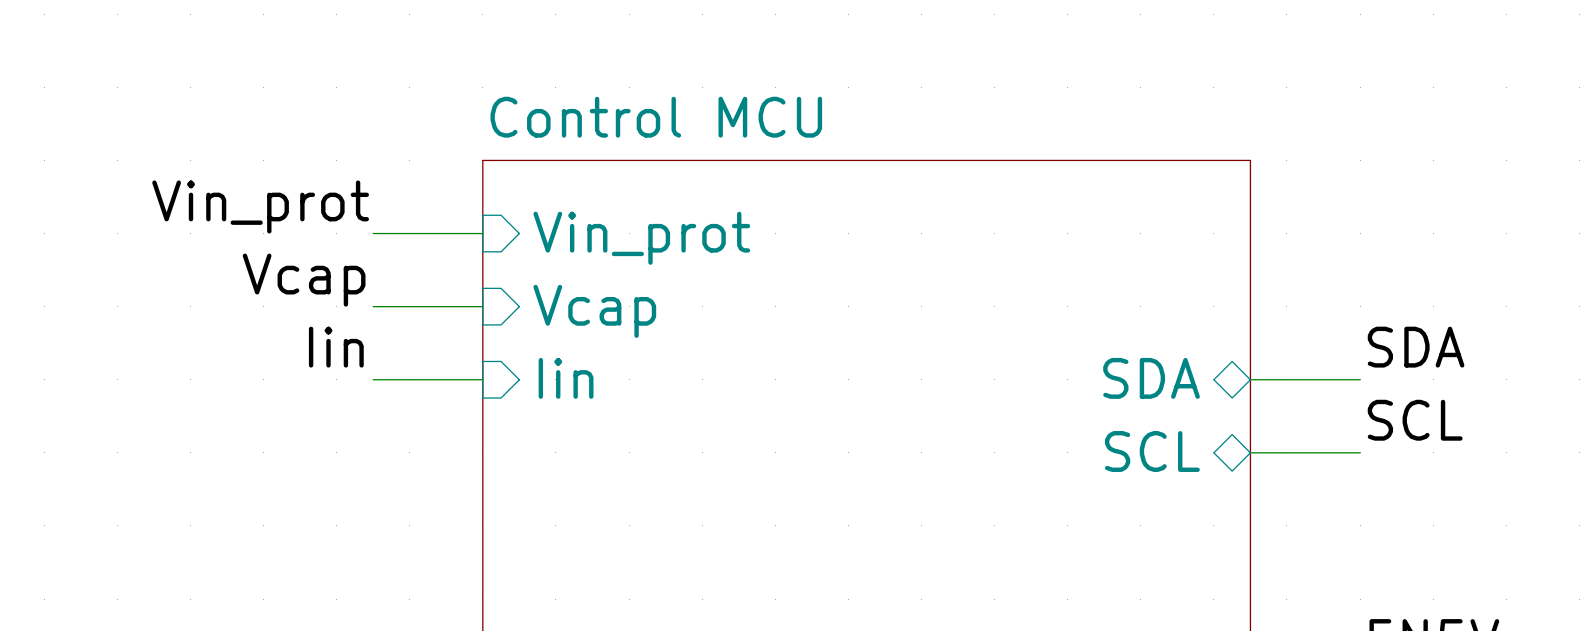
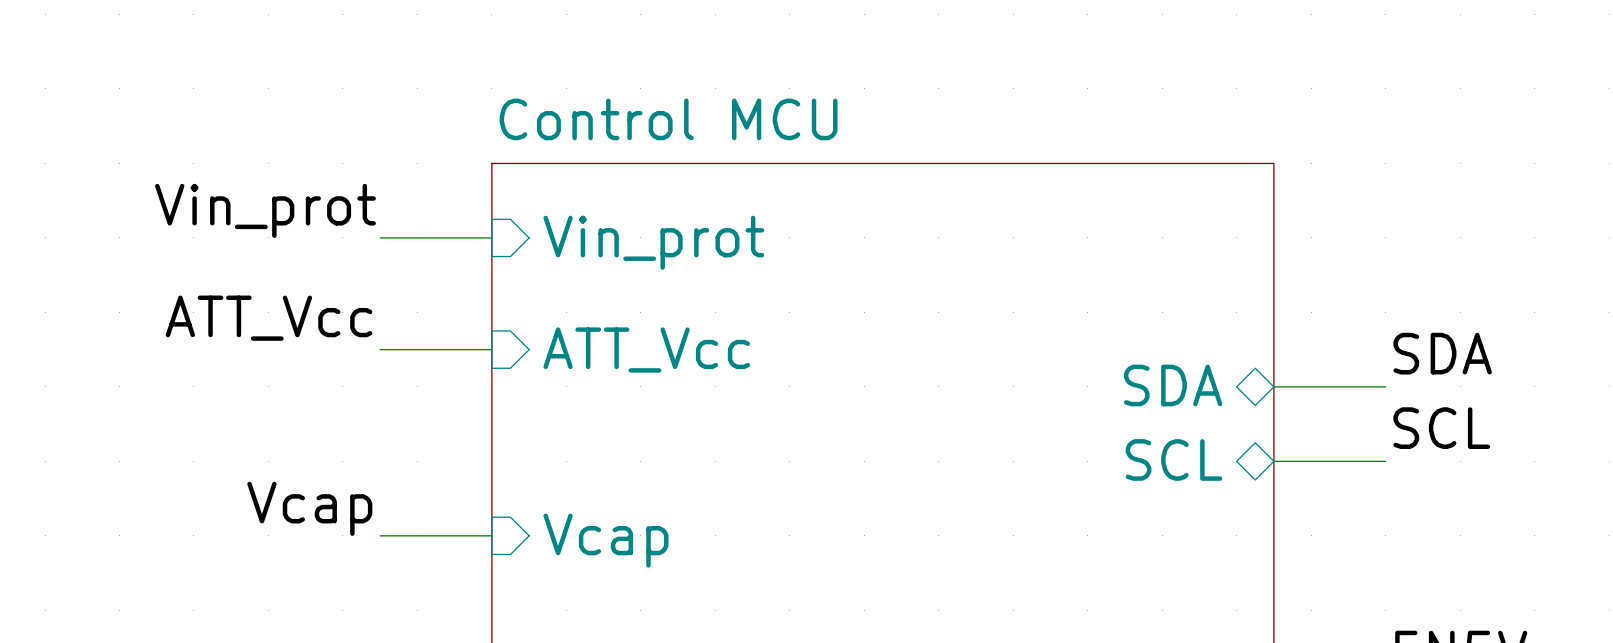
label position: Vcap (304, 280) -> Vcap (309, 508)
wire: (373, 306) (482, 306) -> (380, 349) (491, 349)
sheet pin position: Vcap (594, 311) -> Vcap (605, 540)
label: none -> ATT_Vcc (269, 318)
sheet pin: none -> ATT_Vcc (646, 350)
label: Iin (336, 347) -> none
sheet pin: Iin (566, 378) -> none
wire: (373, 379) (482, 379) -> (380, 535) (491, 535)

